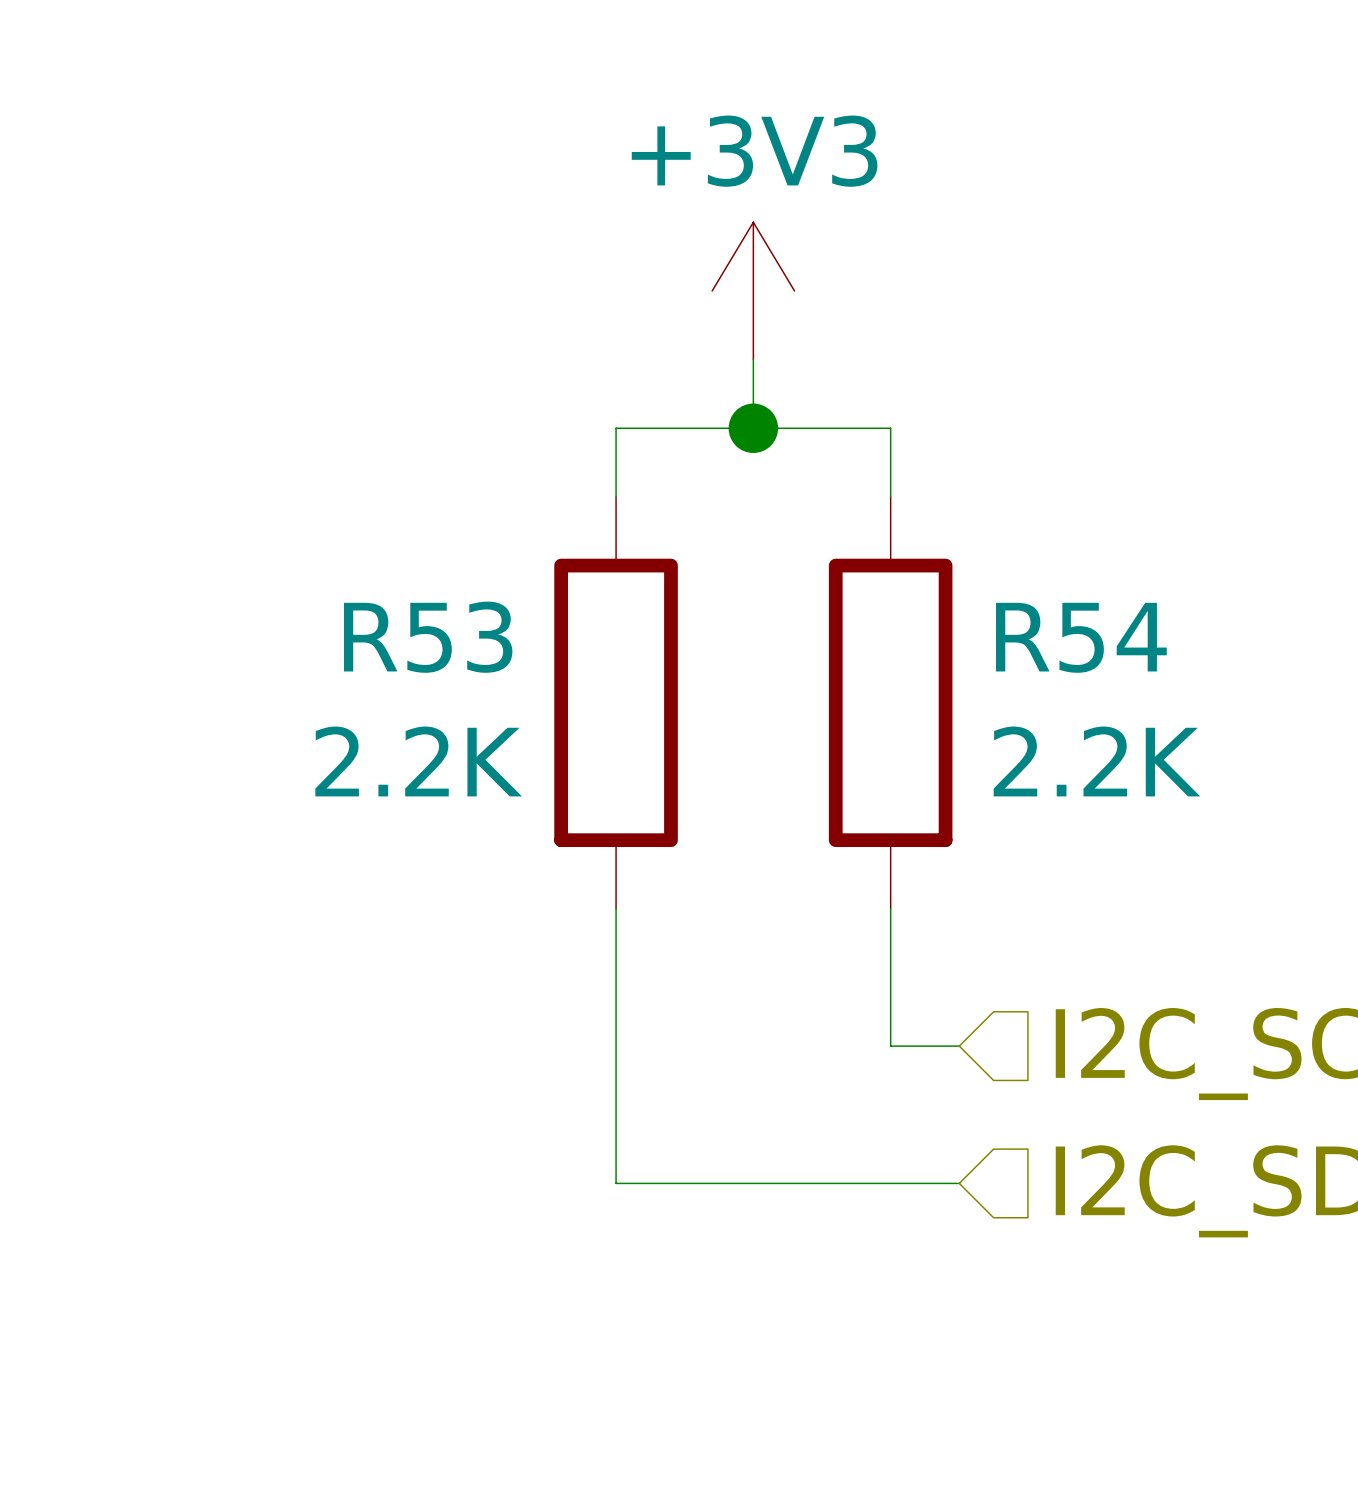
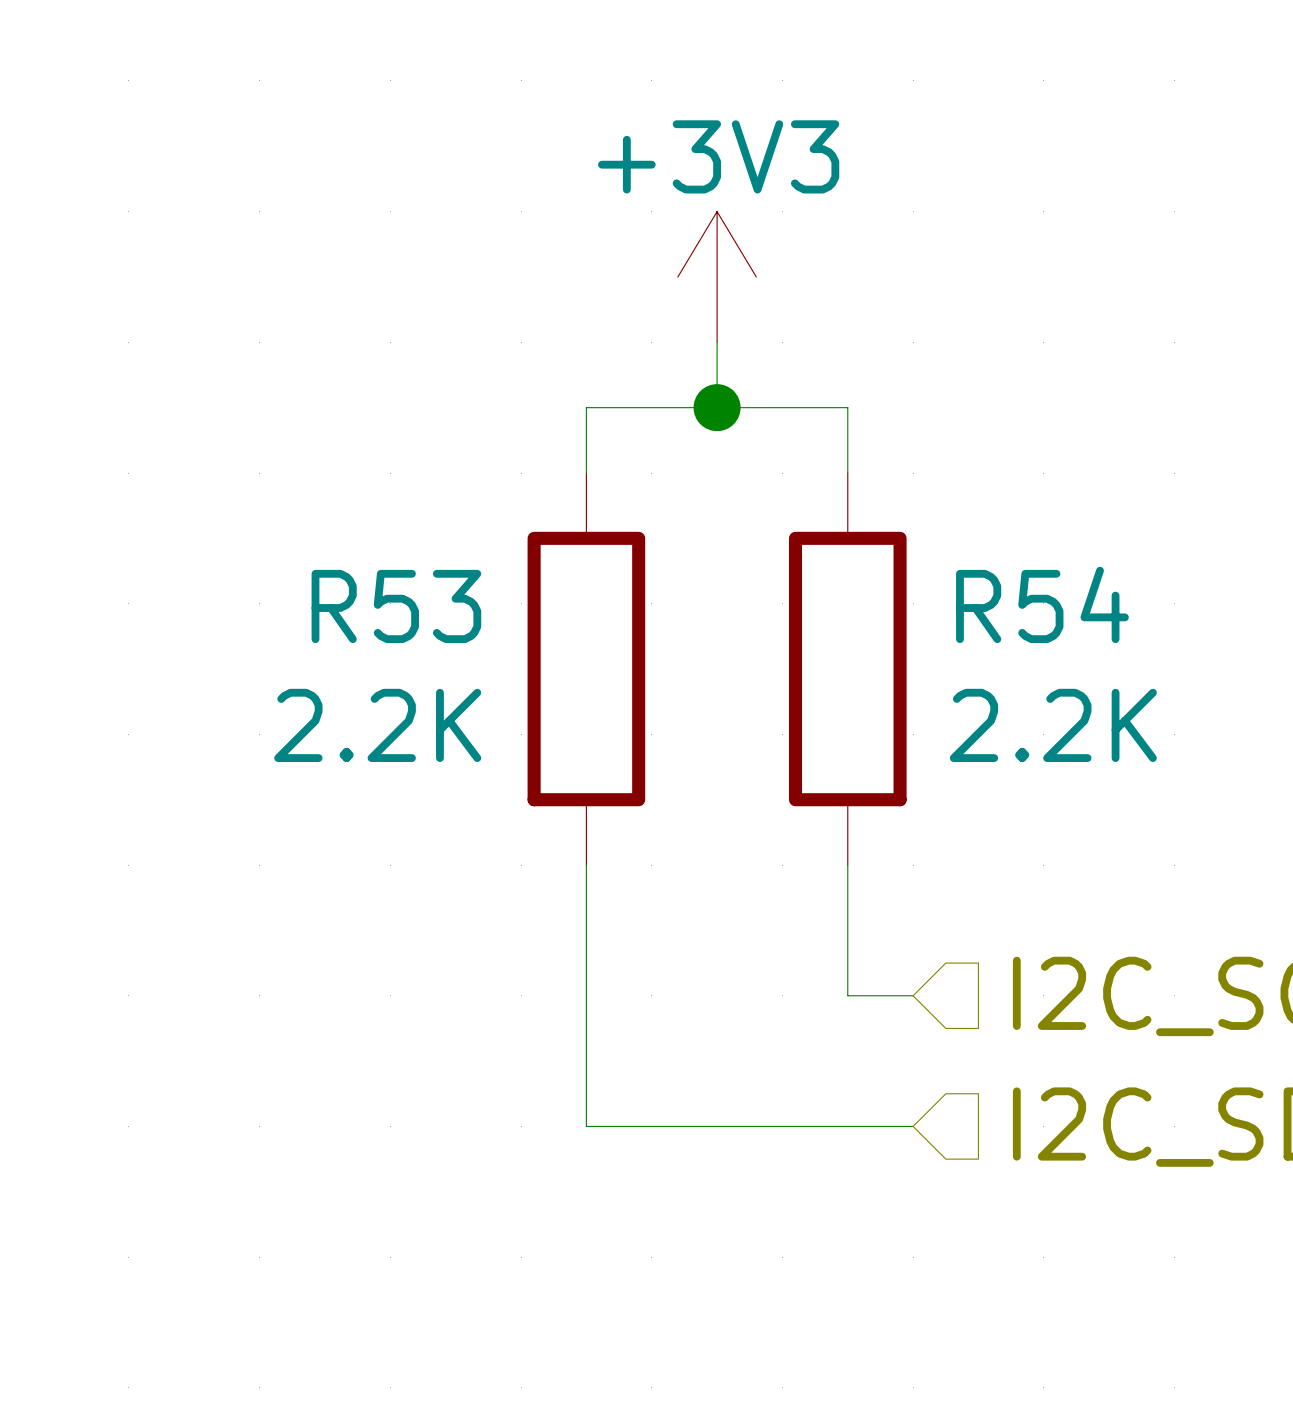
power symbol text position: +3V3 (754, 151) -> +3V3 (718, 156)

